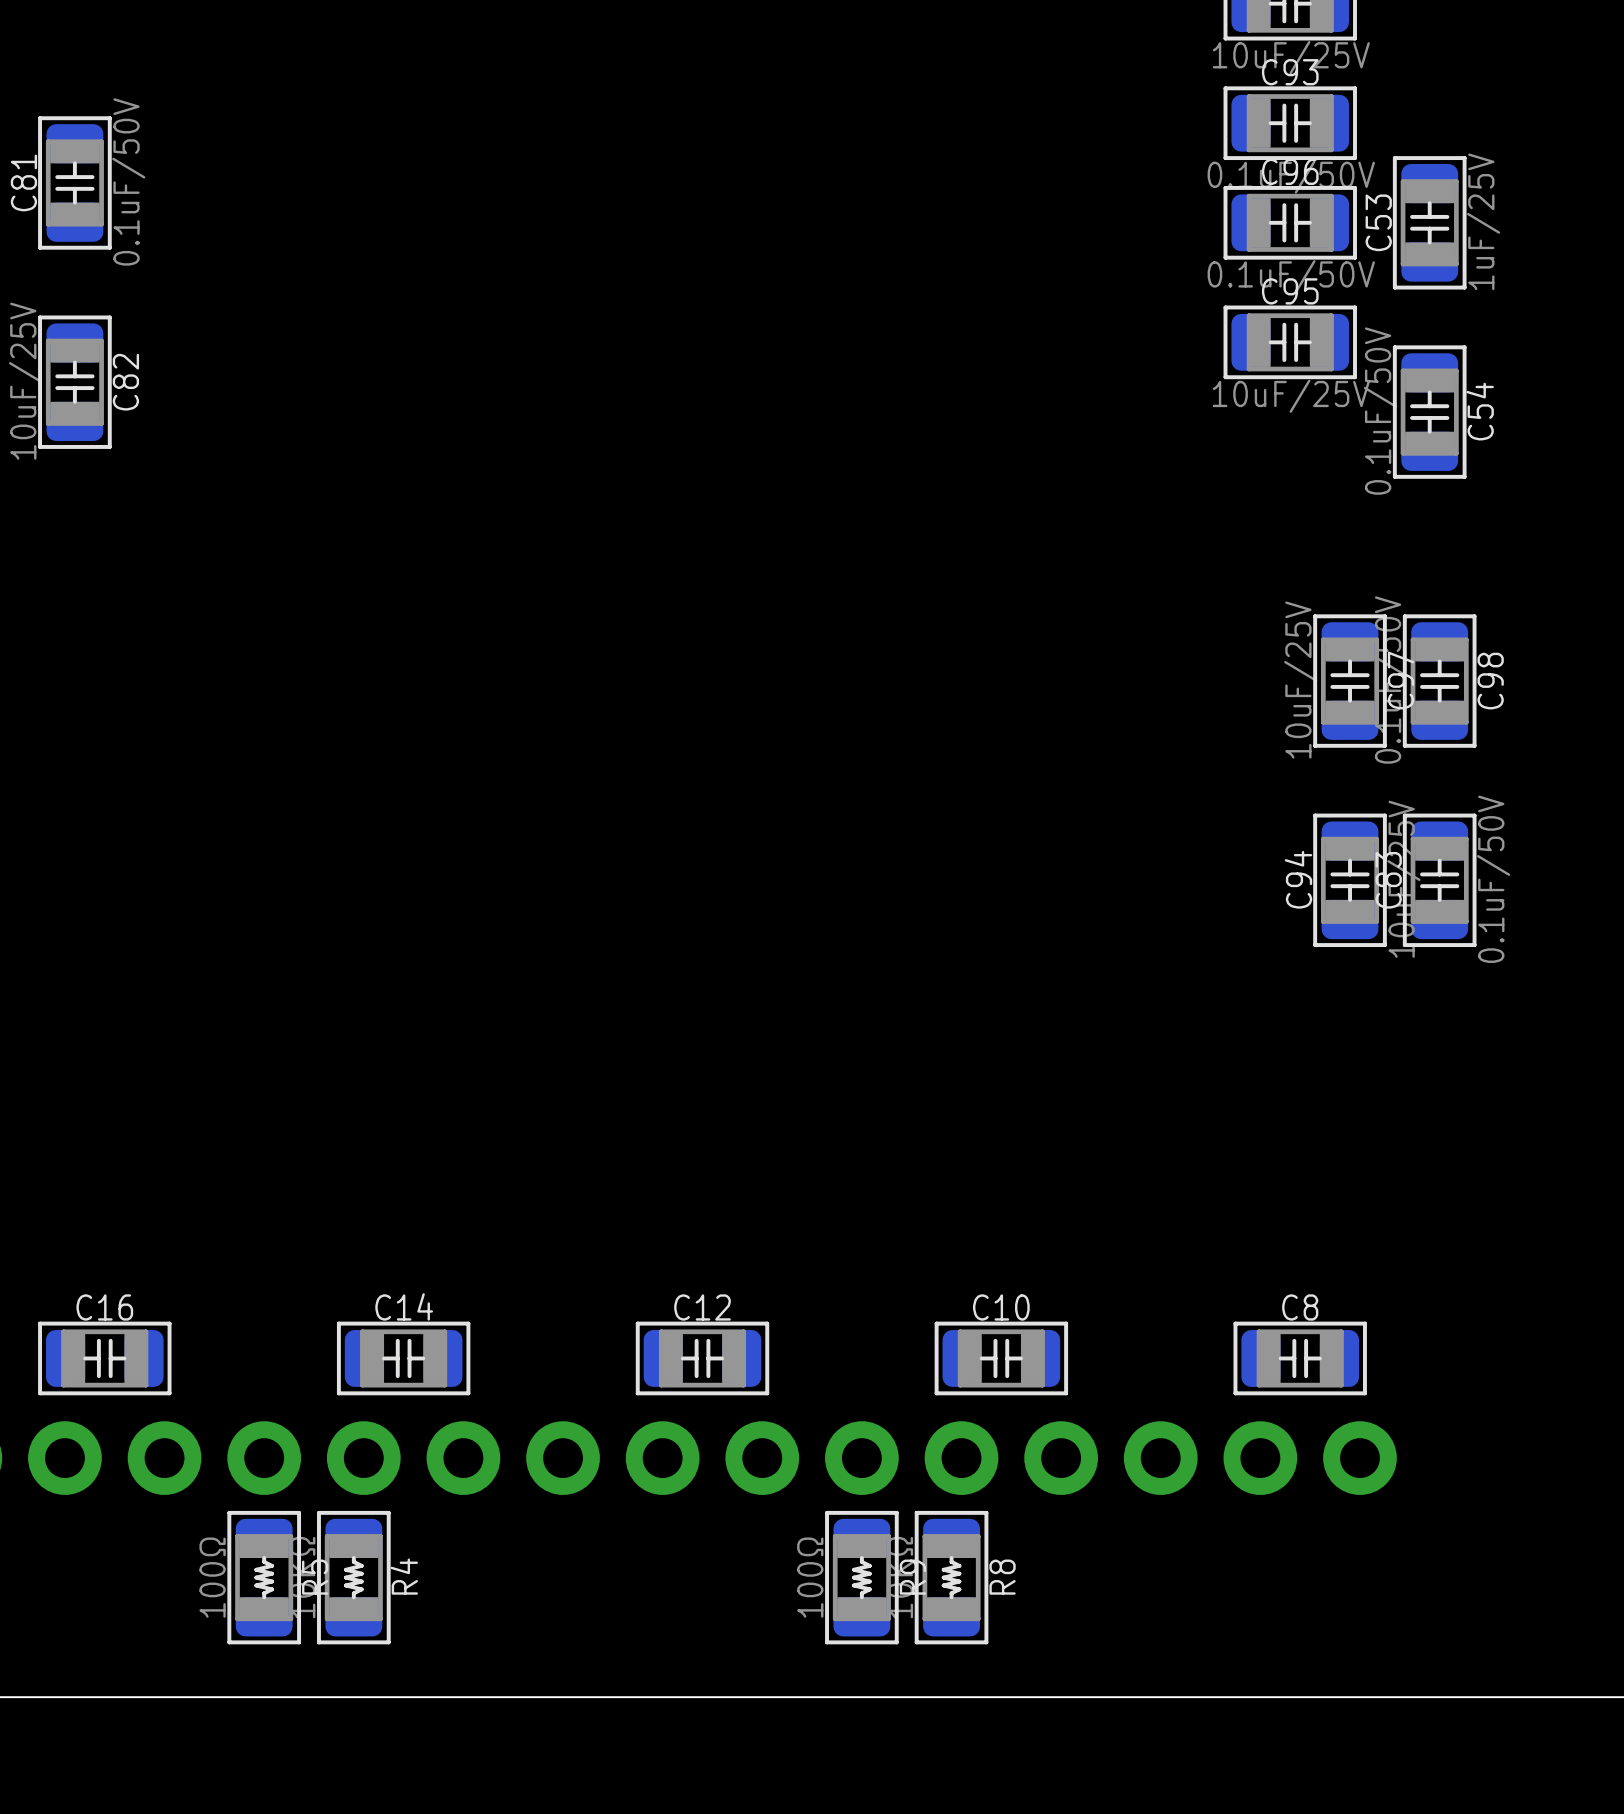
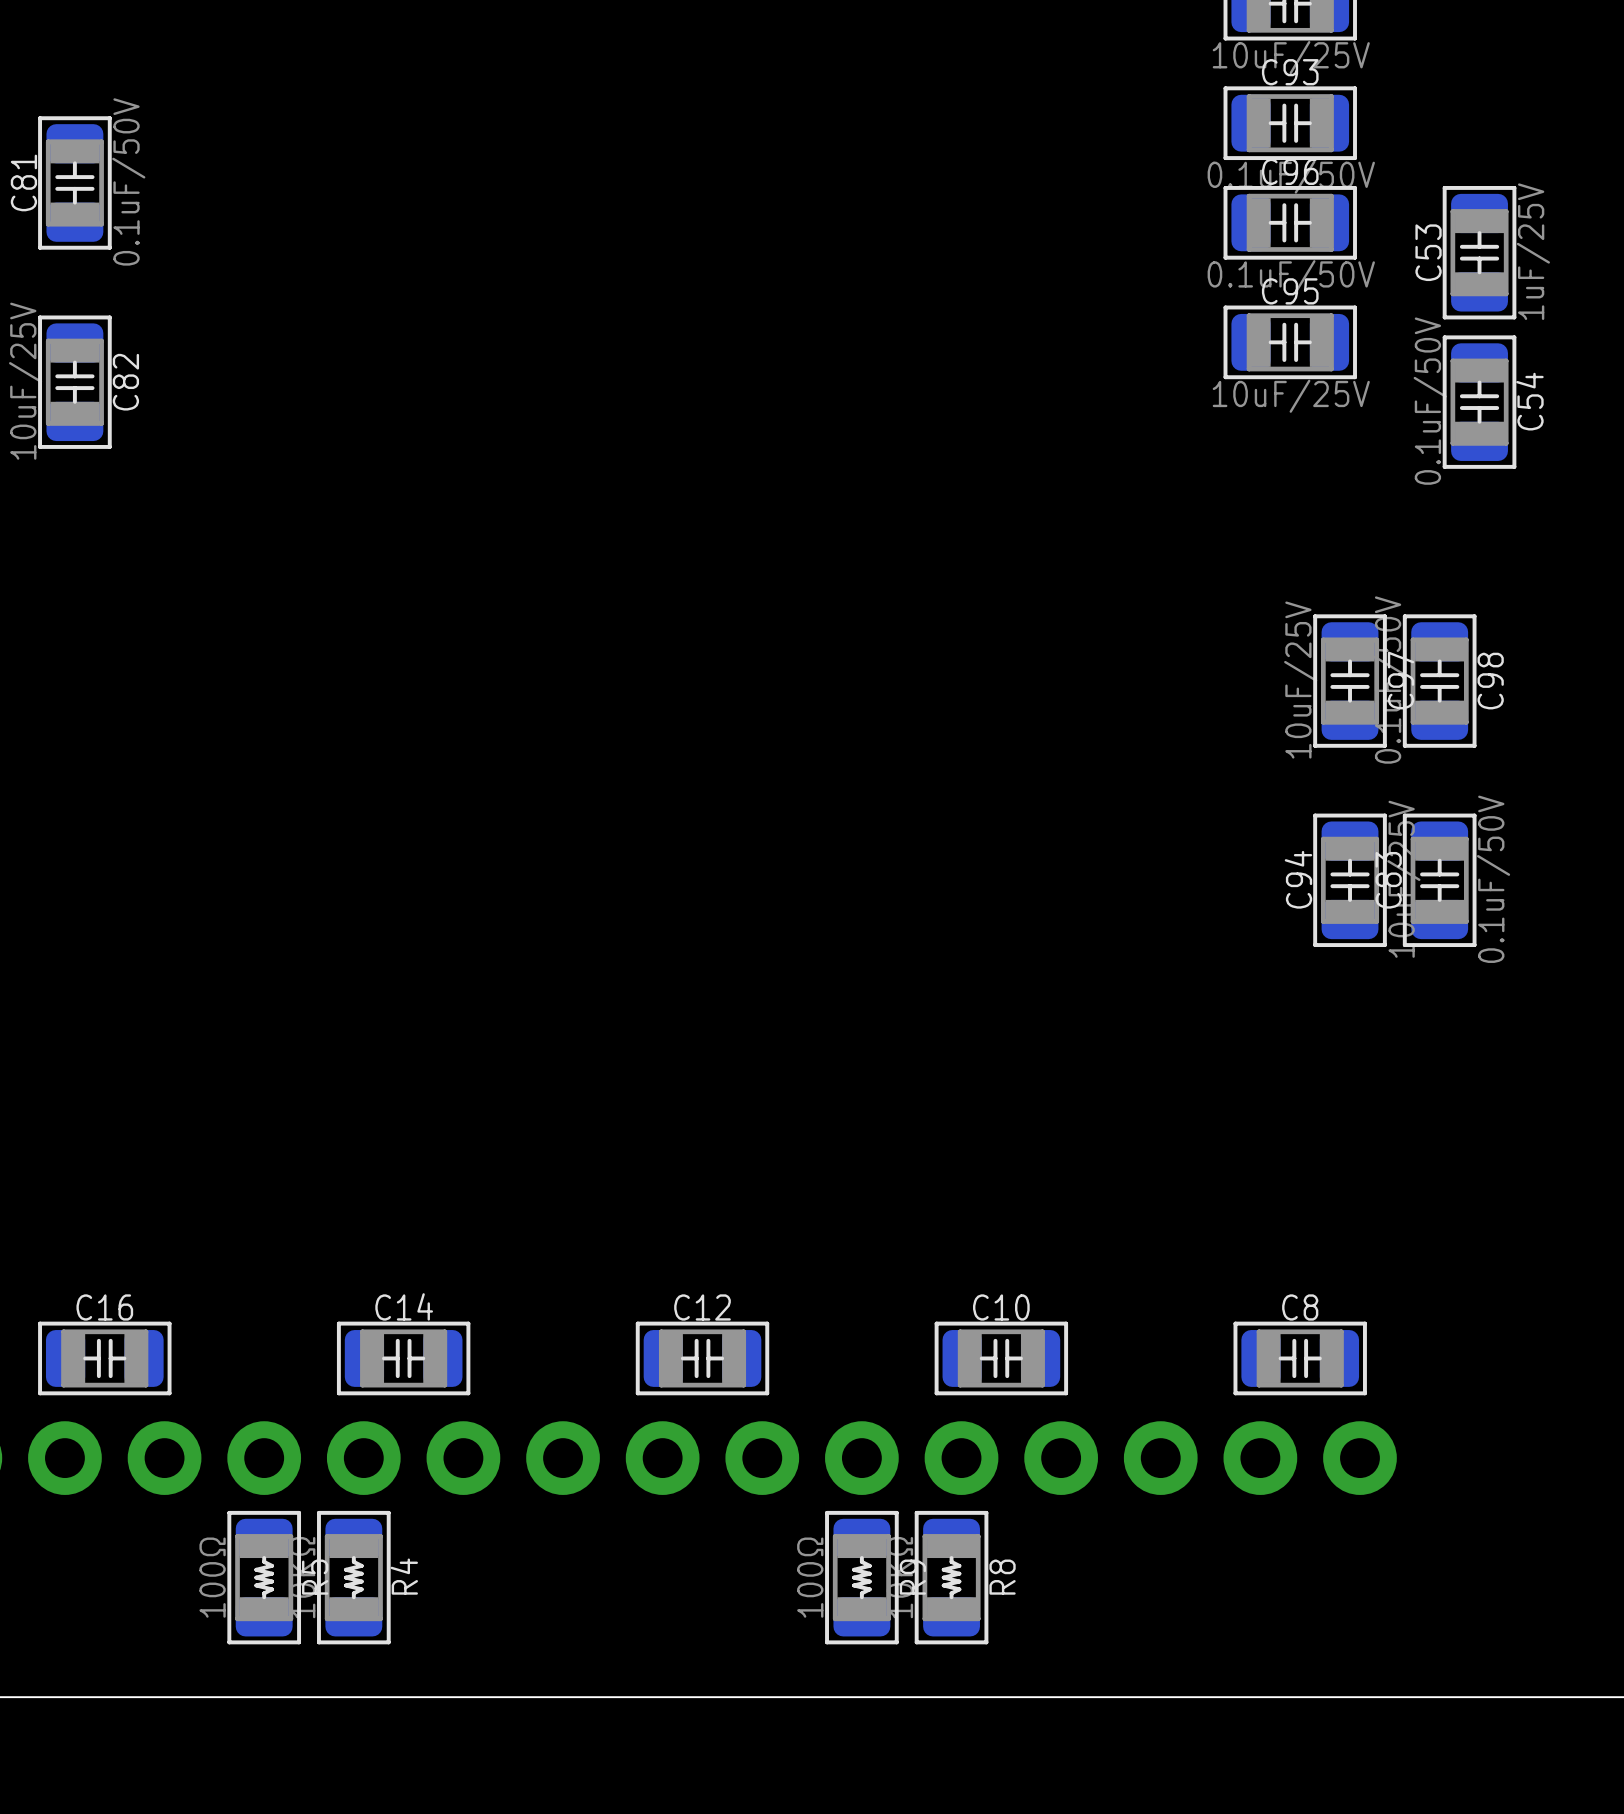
C53 position: (1429, 222) -> (1479, 252)
C54 position: (1429, 412) -> (1479, 402)

